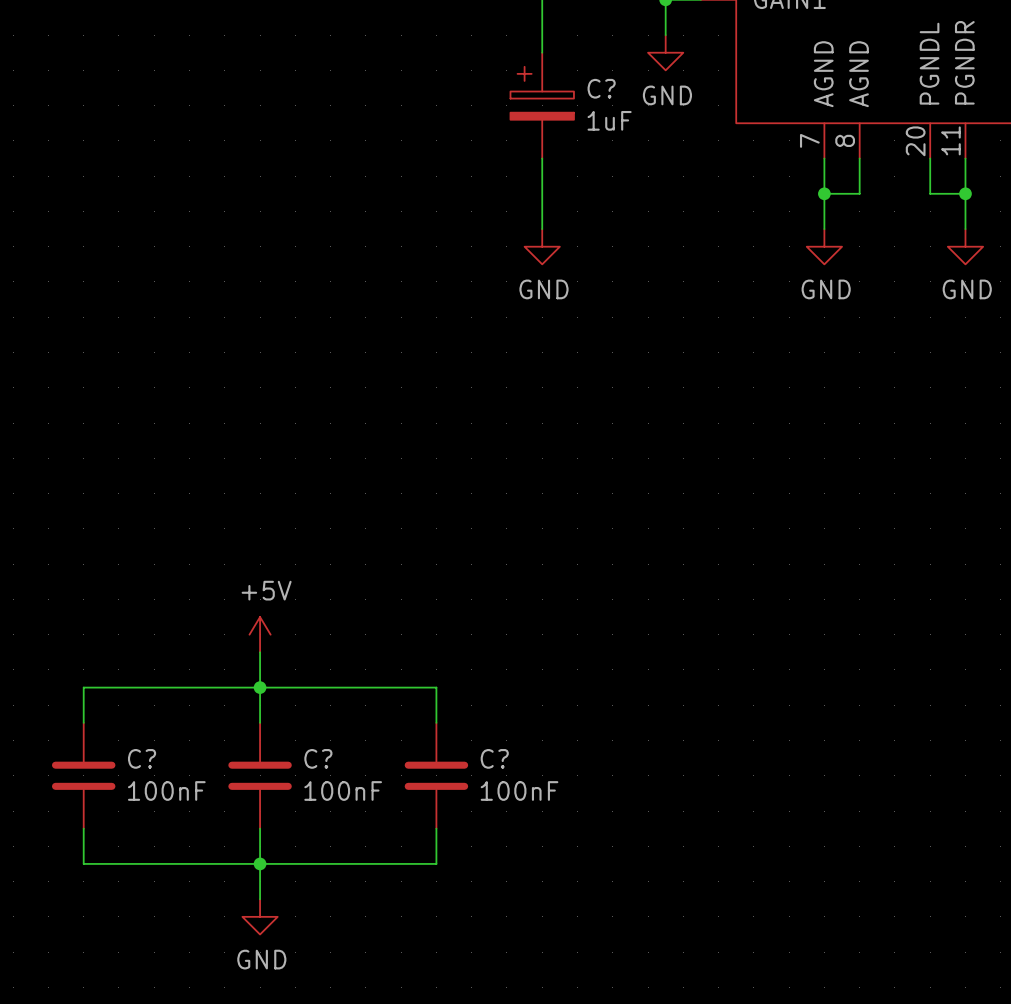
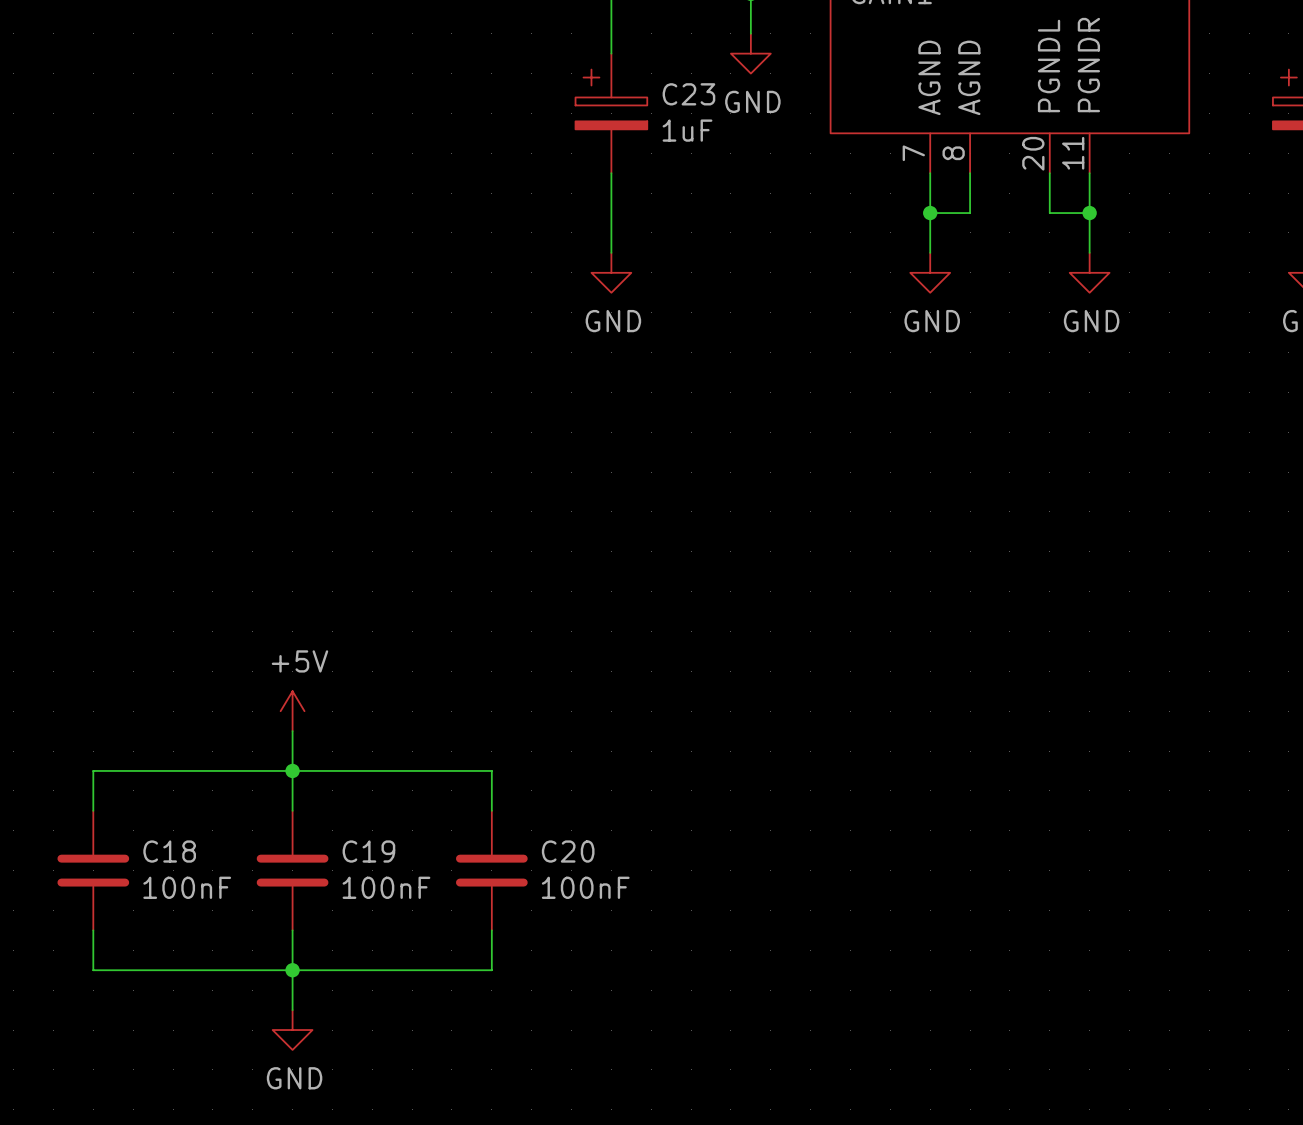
C? name: C? (601, 88) -> C23 (688, 94)
C? name: C? (142, 758) -> C18 (169, 851)
C? name: C? (318, 758) -> C19 (368, 851)
C? name: C? (494, 758) -> C20 (568, 851)

